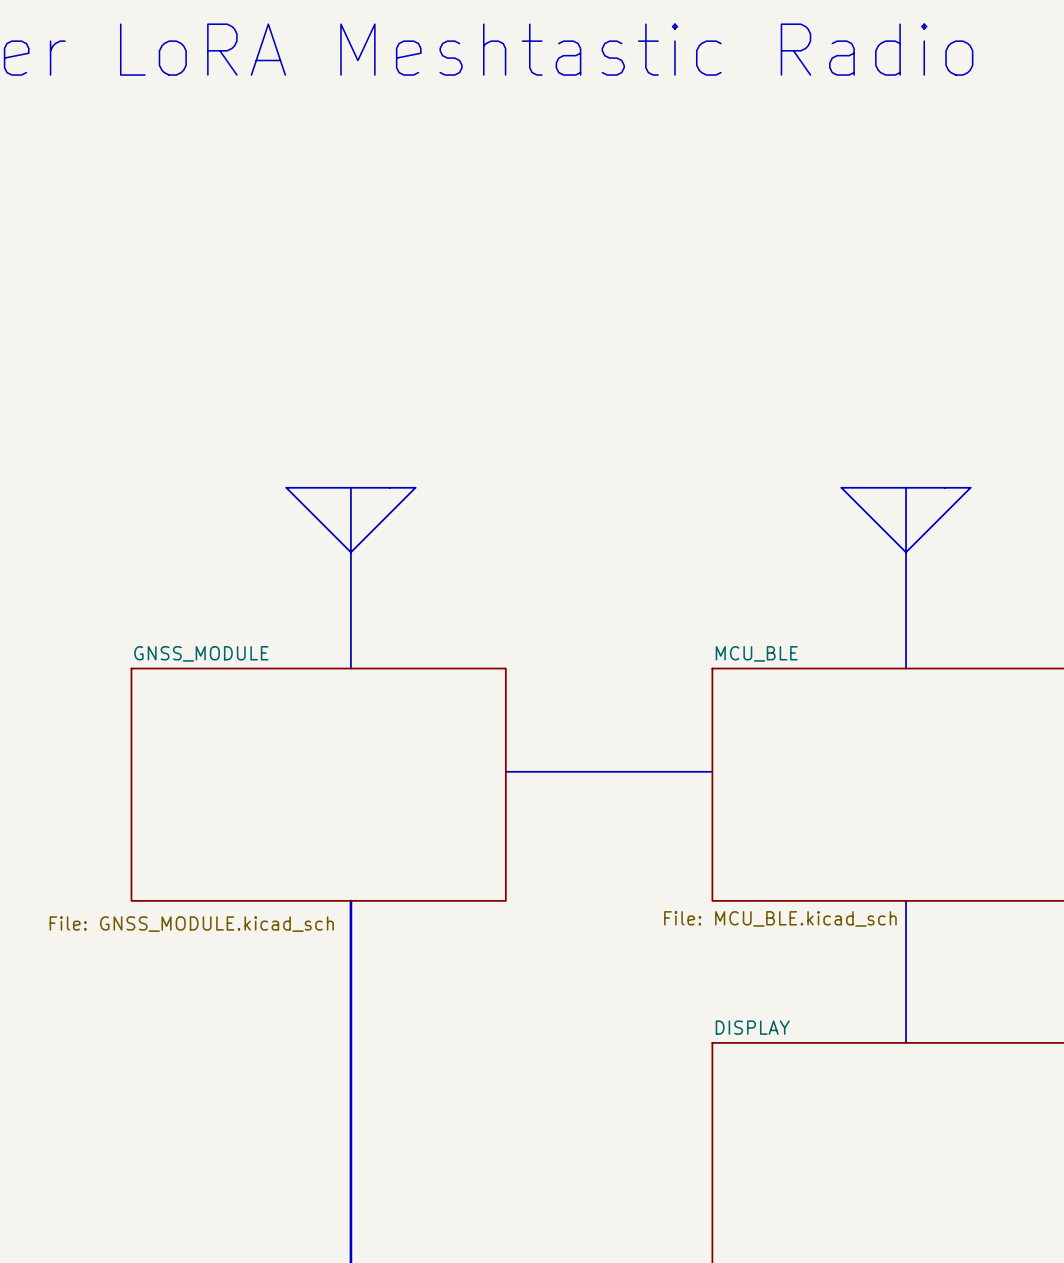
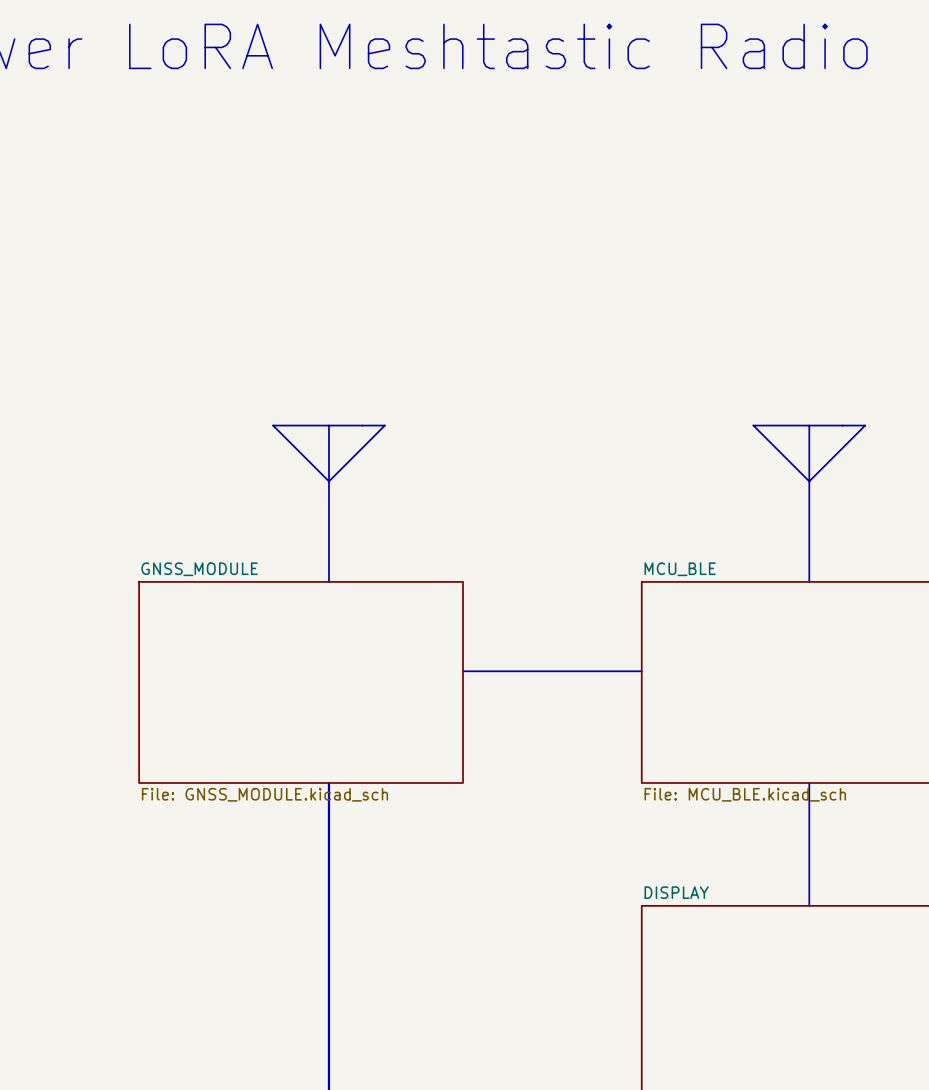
sheet MCU_BLE value position: File: MCU_BLE.kicad_sch (780, 918) -> File: MCU_BLE.kicad_sch (745, 794)
sheet GNSS_MODULE value position: File: GNSS_MODULE.kicad_sch (191, 924) -> File: GNSS_MODULE.kicad_sch (264, 794)

